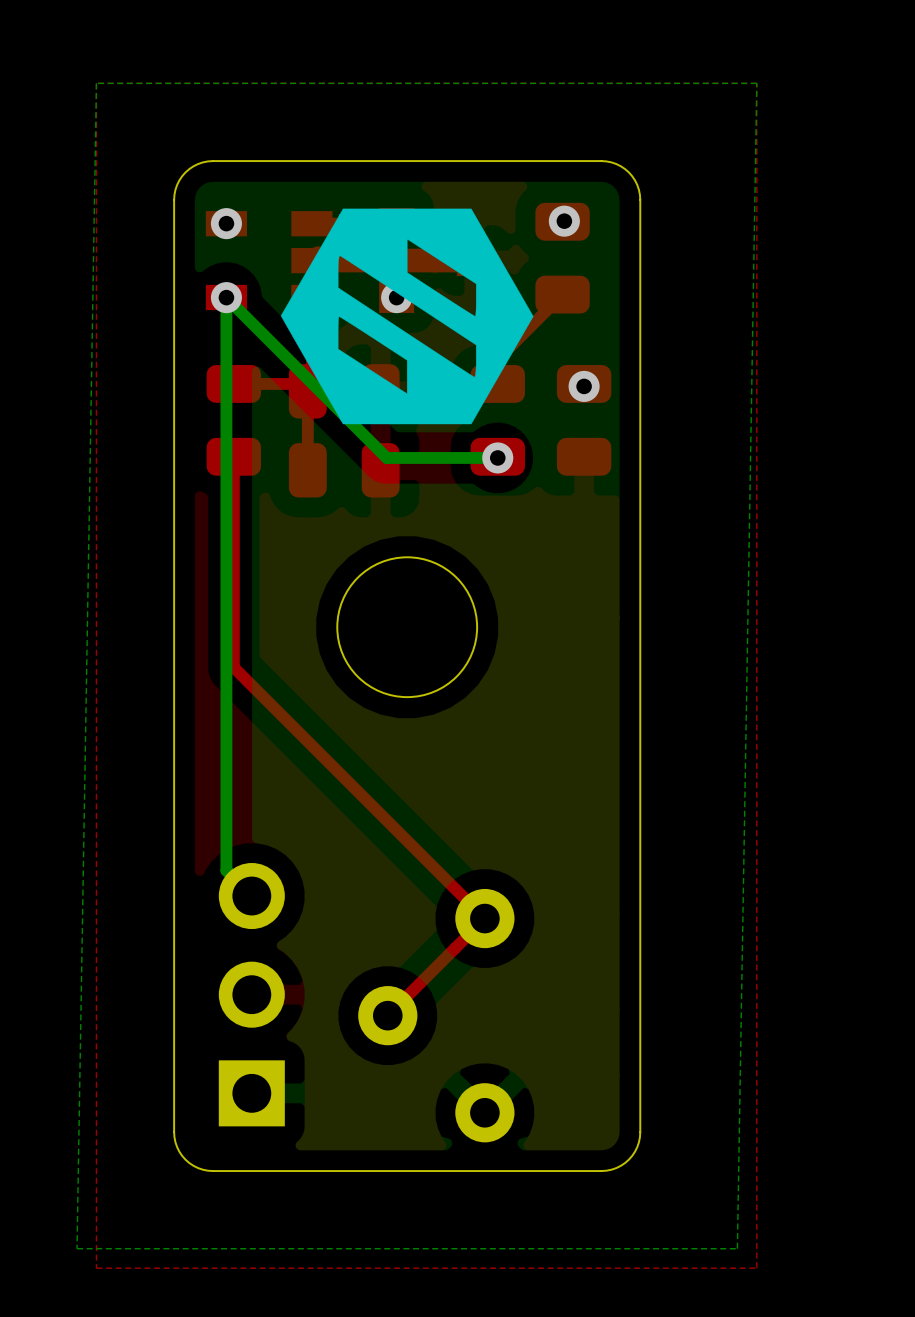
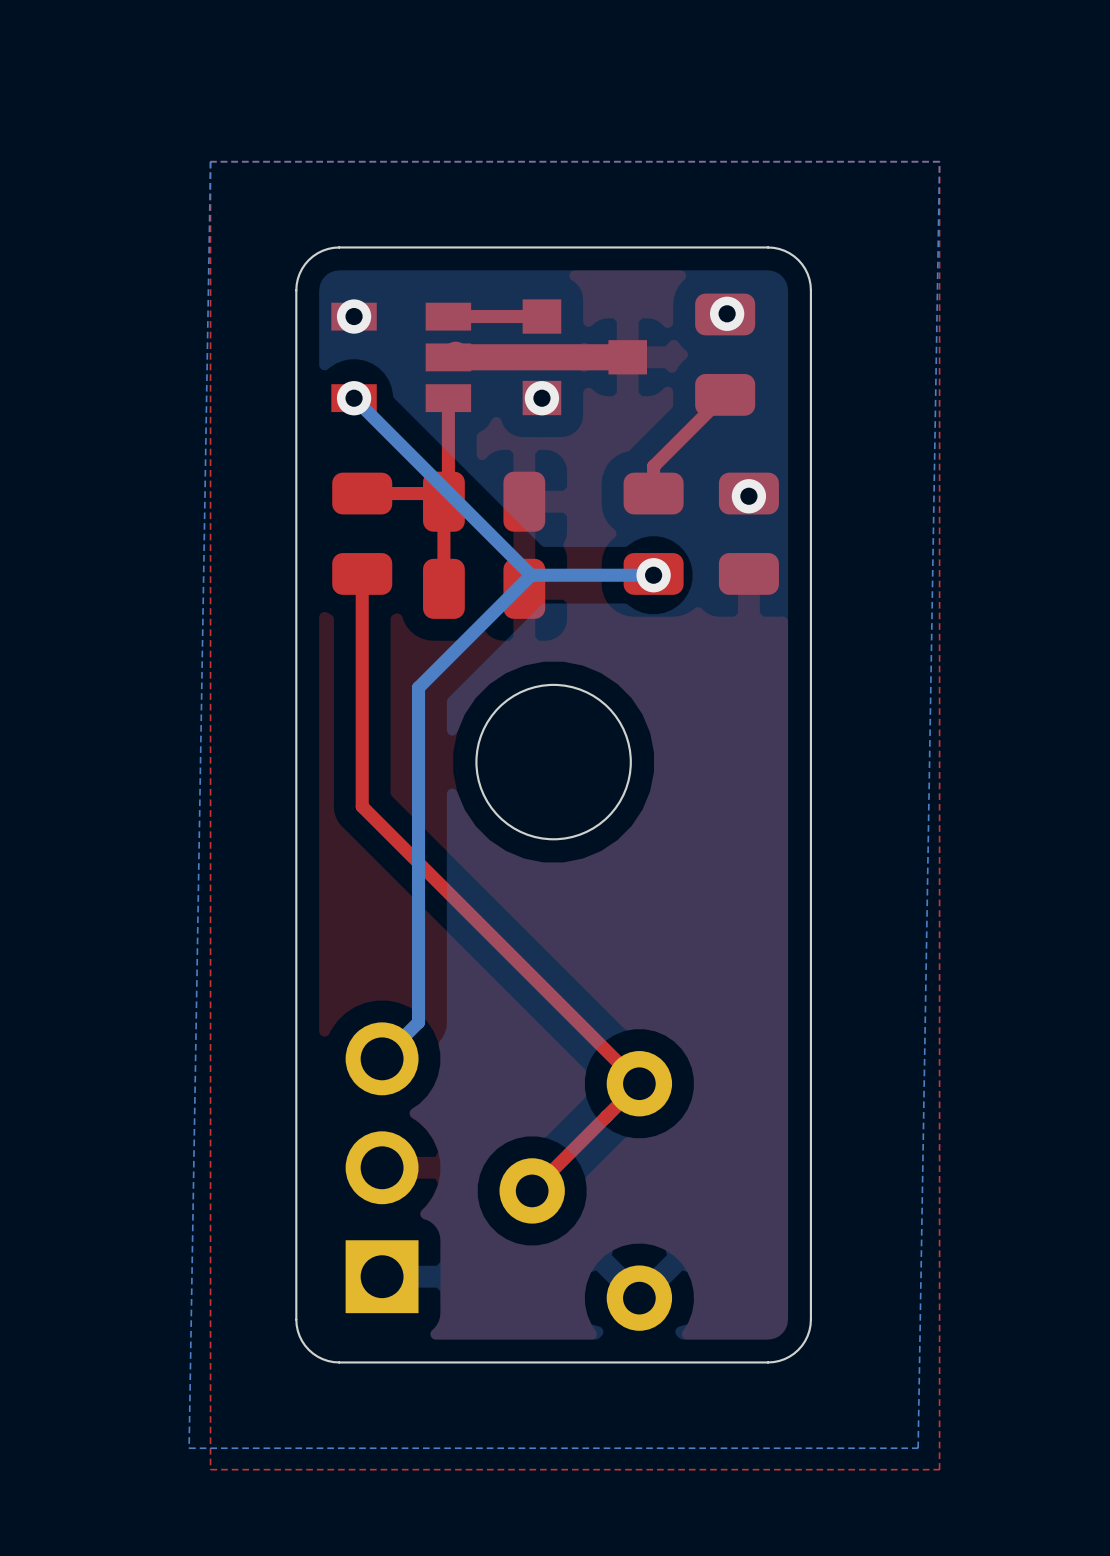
drawing: [280, 208, 534, 425] -> none
bottom track: (226, 297) (226, 870) (251, 896) -> (531, 575) (418, 687) (418, 1022) (382, 1058)

